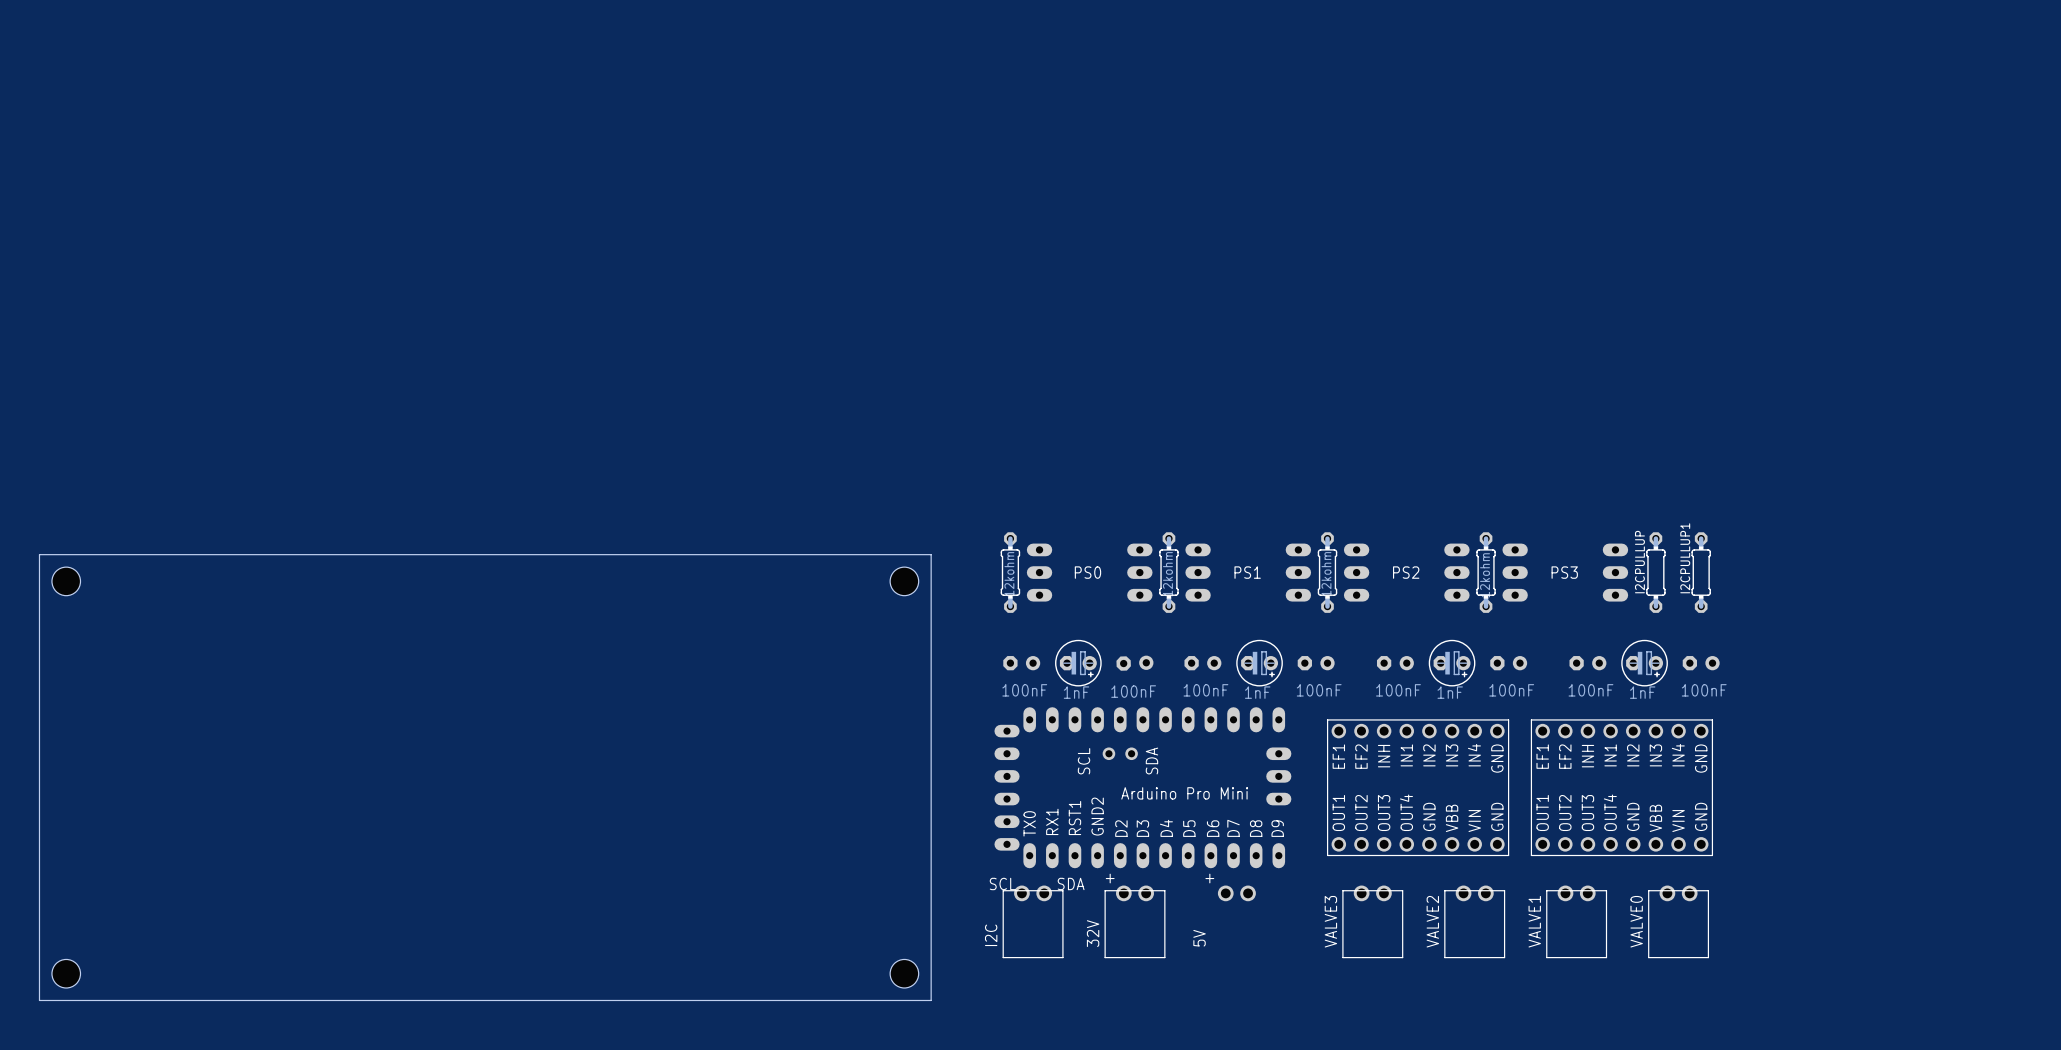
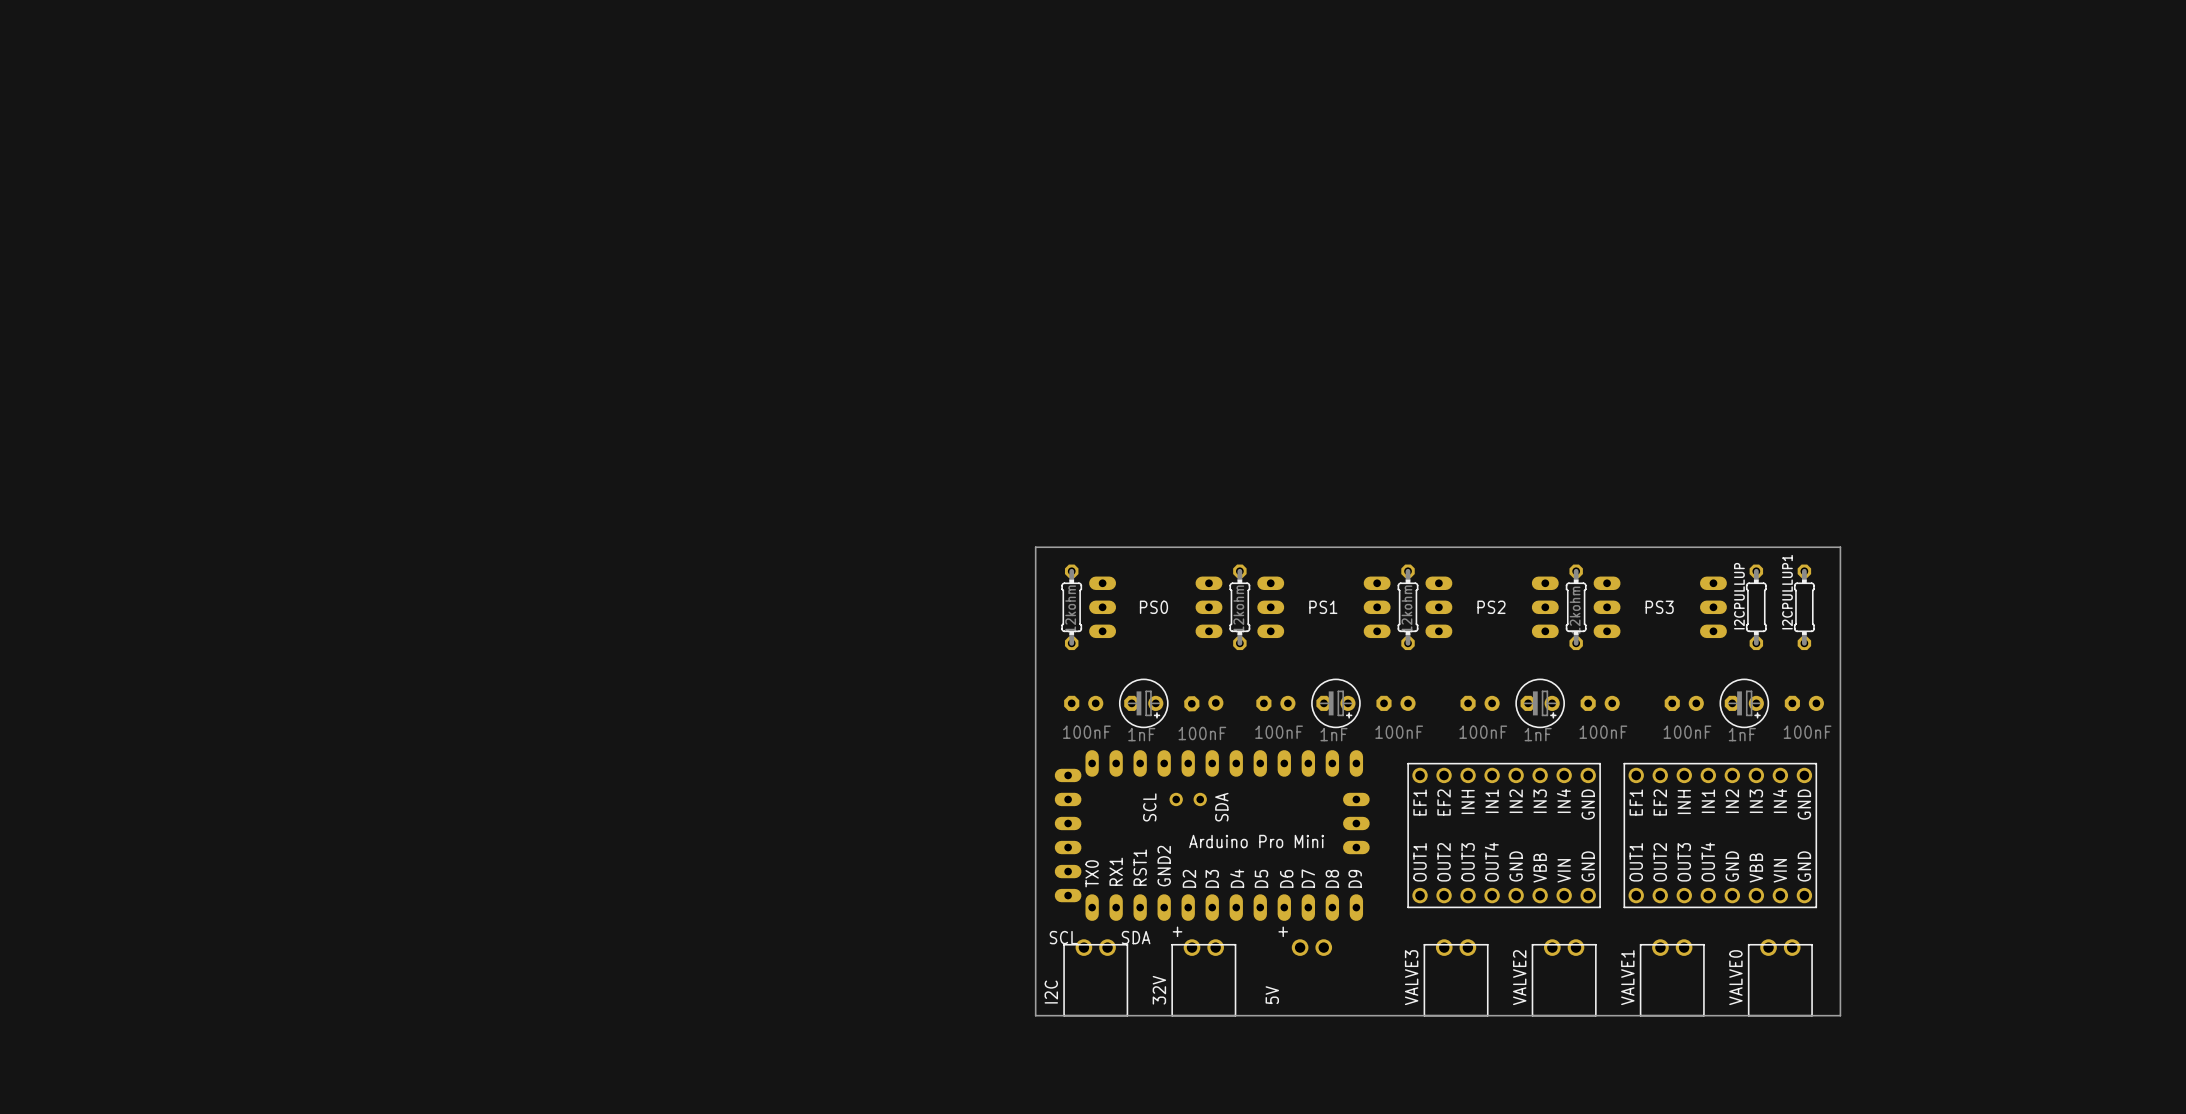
board edge: none -> (1035, 547) (1840, 547) (1840, 1015) (1035, 1015) (1035, 547)
board edge: (39, 554) (931, 554) (931, 1000) (39, 1000) (39, 554) -> none
hole: (66, 581) -> none
hole: (904, 581) -> none
hole: (66, 973) -> none
hole: (904, 973) -> none

